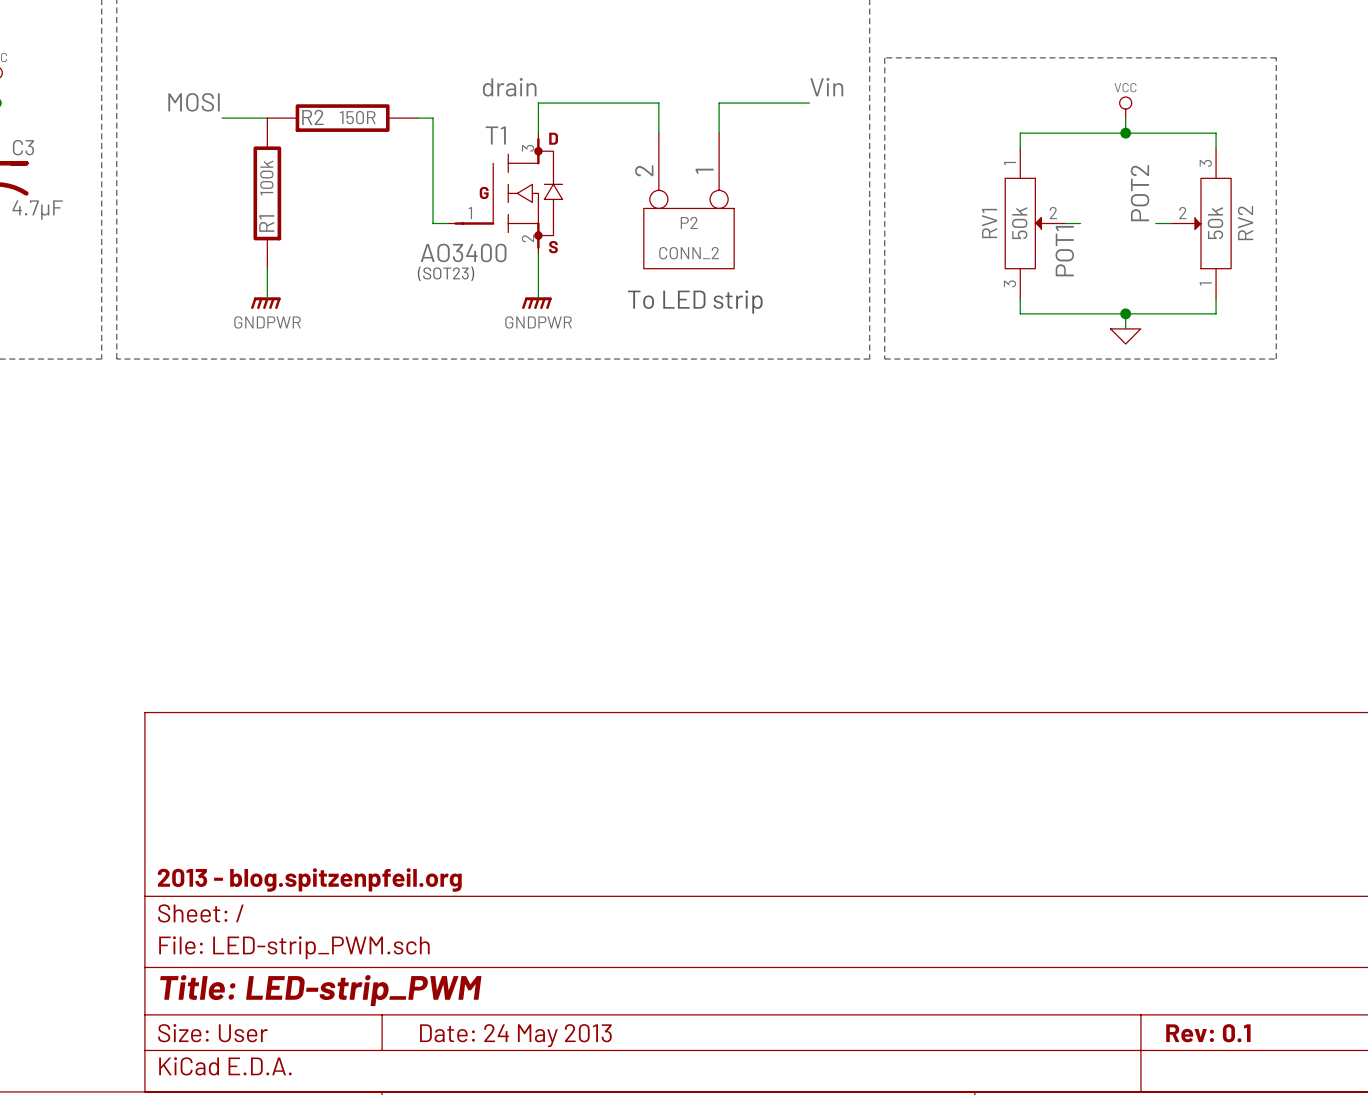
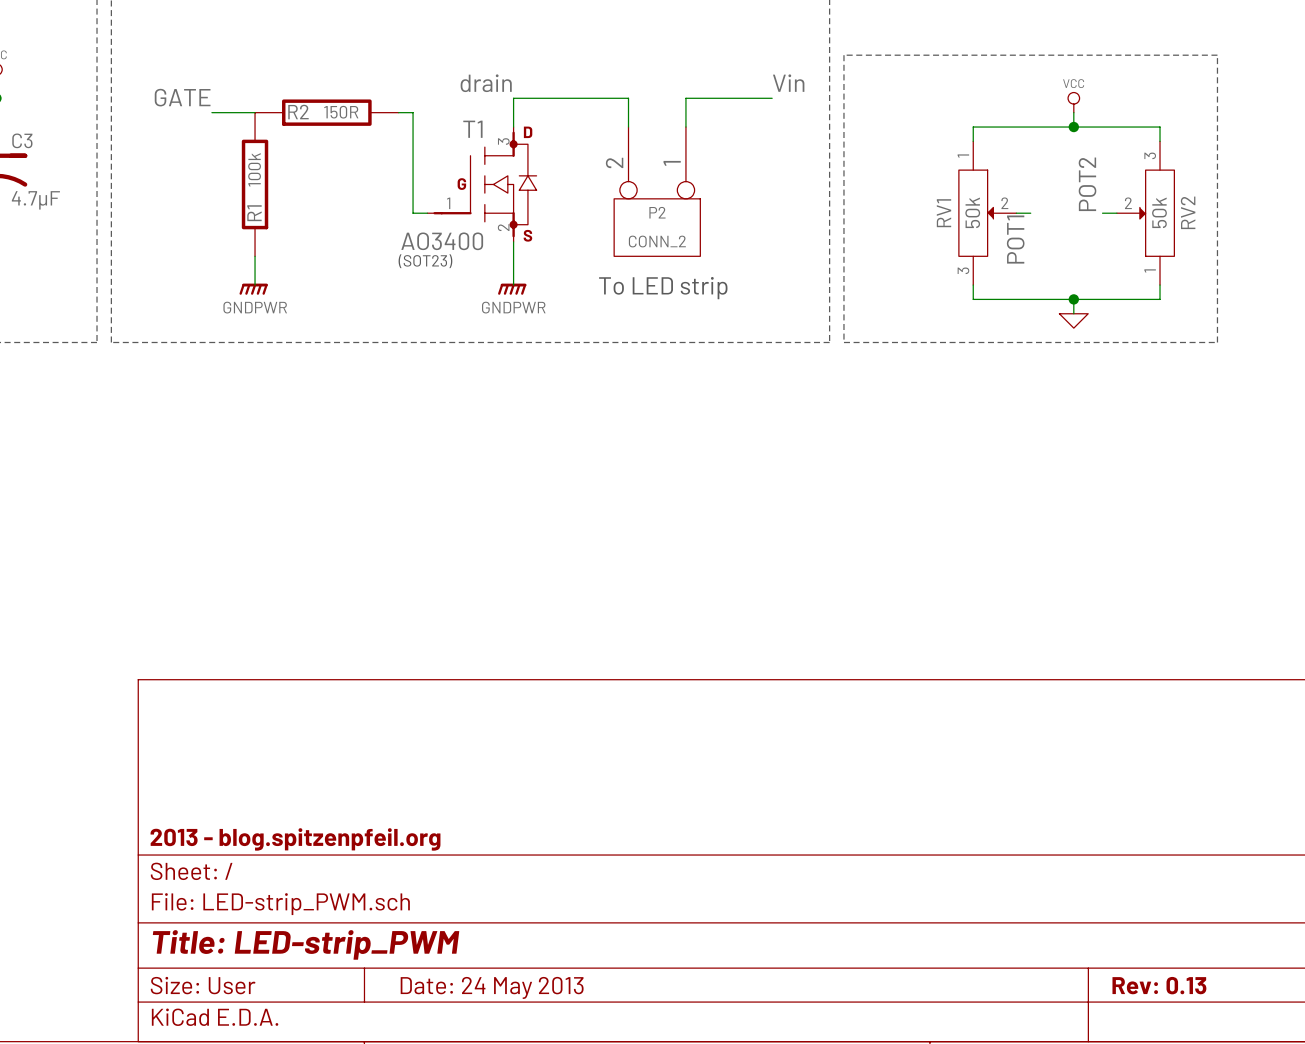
label: MOSI (194, 102) -> GATE (182, 97)
title block: Rev: 0.1 (1208, 1033) -> Rev: 0.13 (1159, 985)

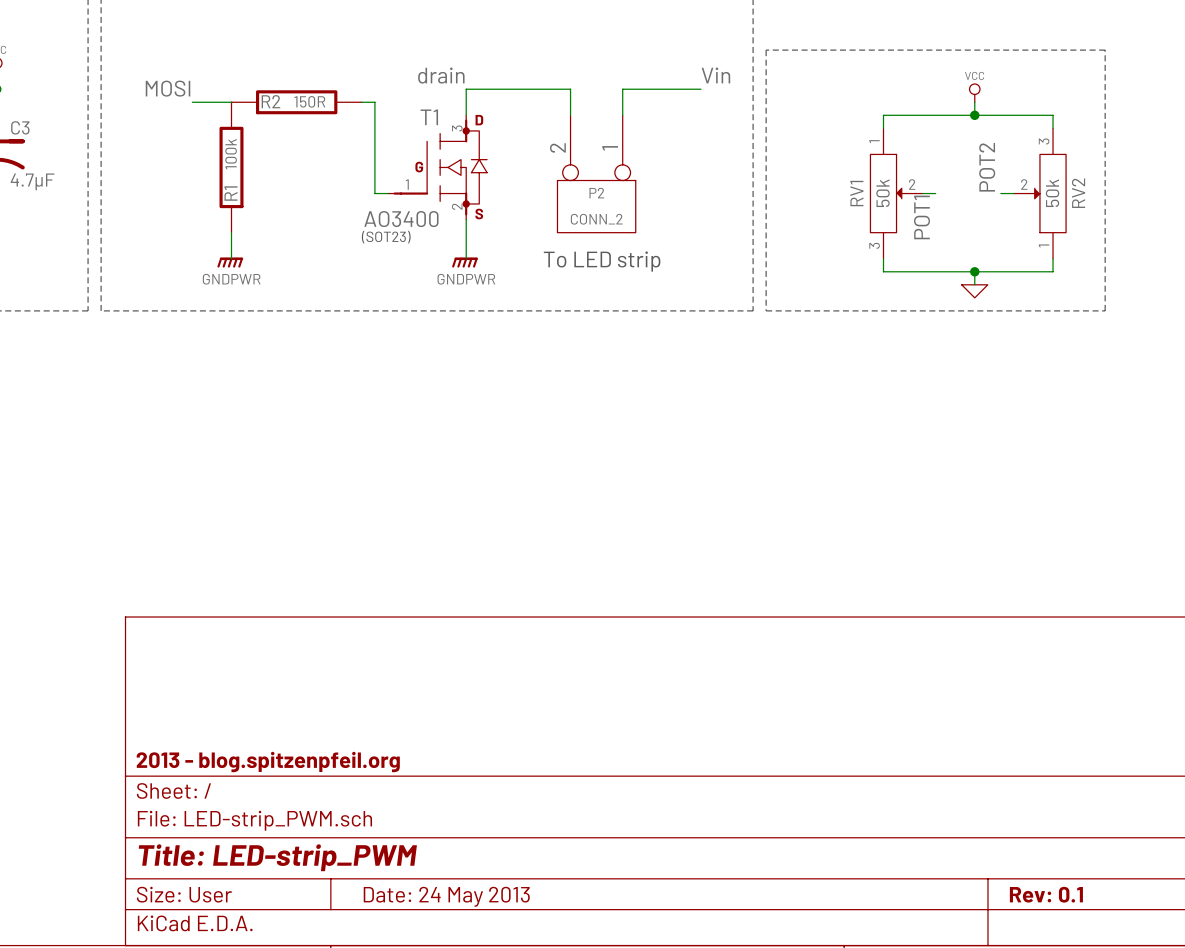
label: GATE (182, 97) -> MOSI (168, 88)
title block: Rev: 0.13 (1159, 985) -> Rev: 0.1 (1046, 894)

